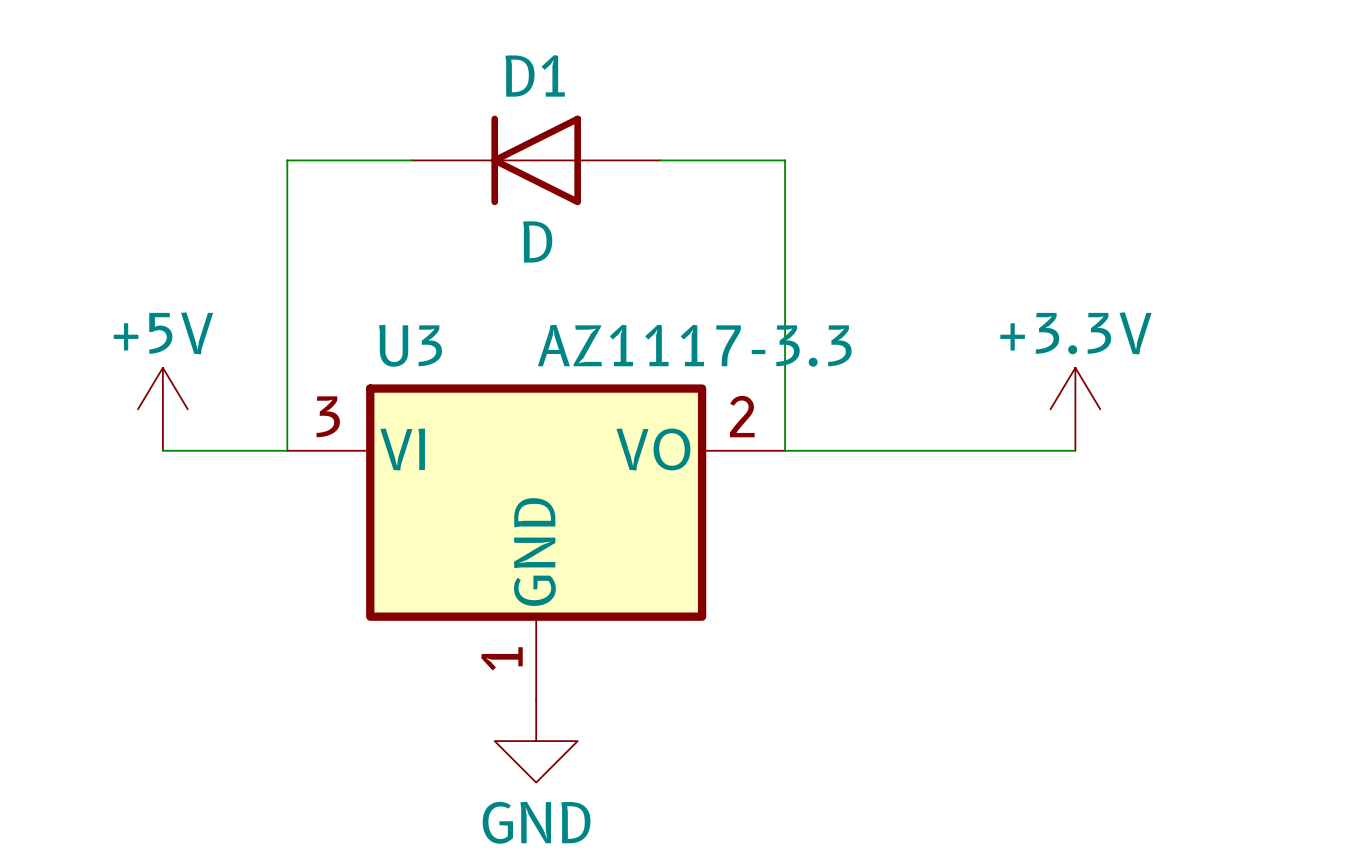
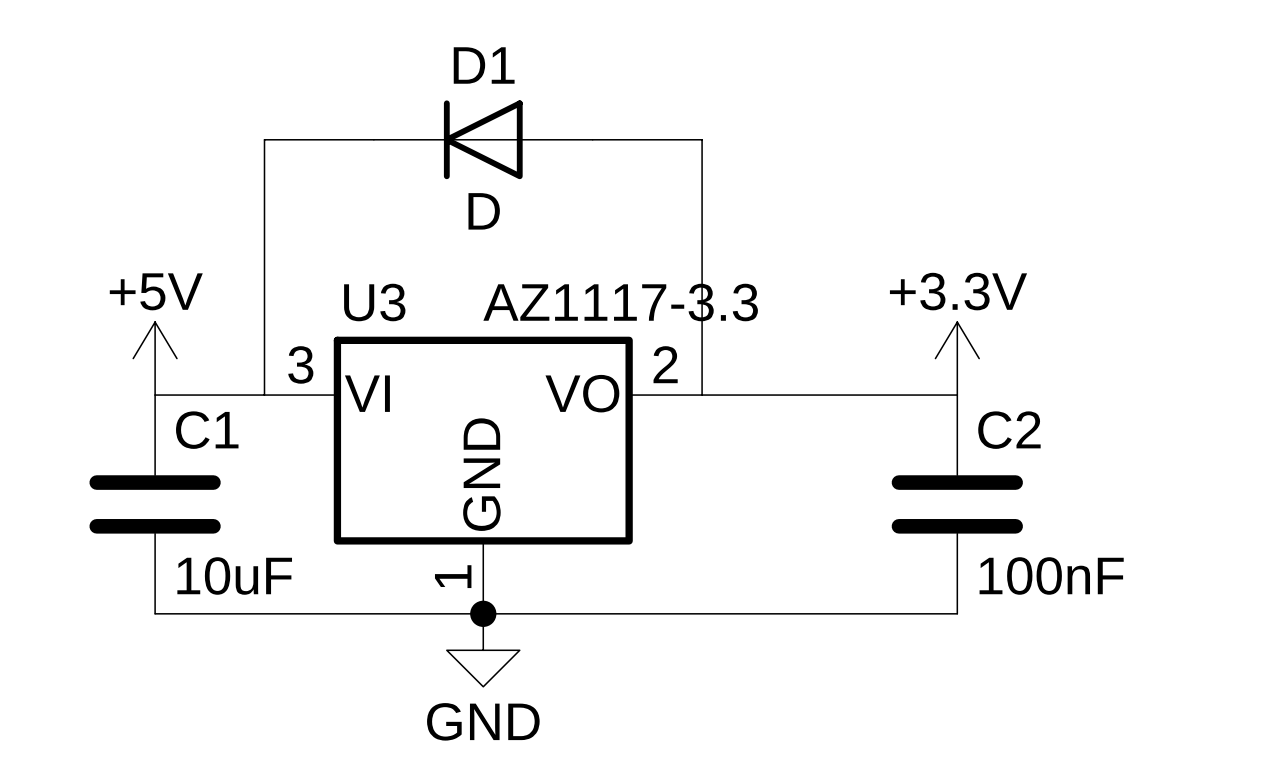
C1: none -> 10uF (155, 504)
C2: none -> 100nF (957, 504)
wire: none -> (155, 613) (957, 613)
junction: none -> (483, 613)

